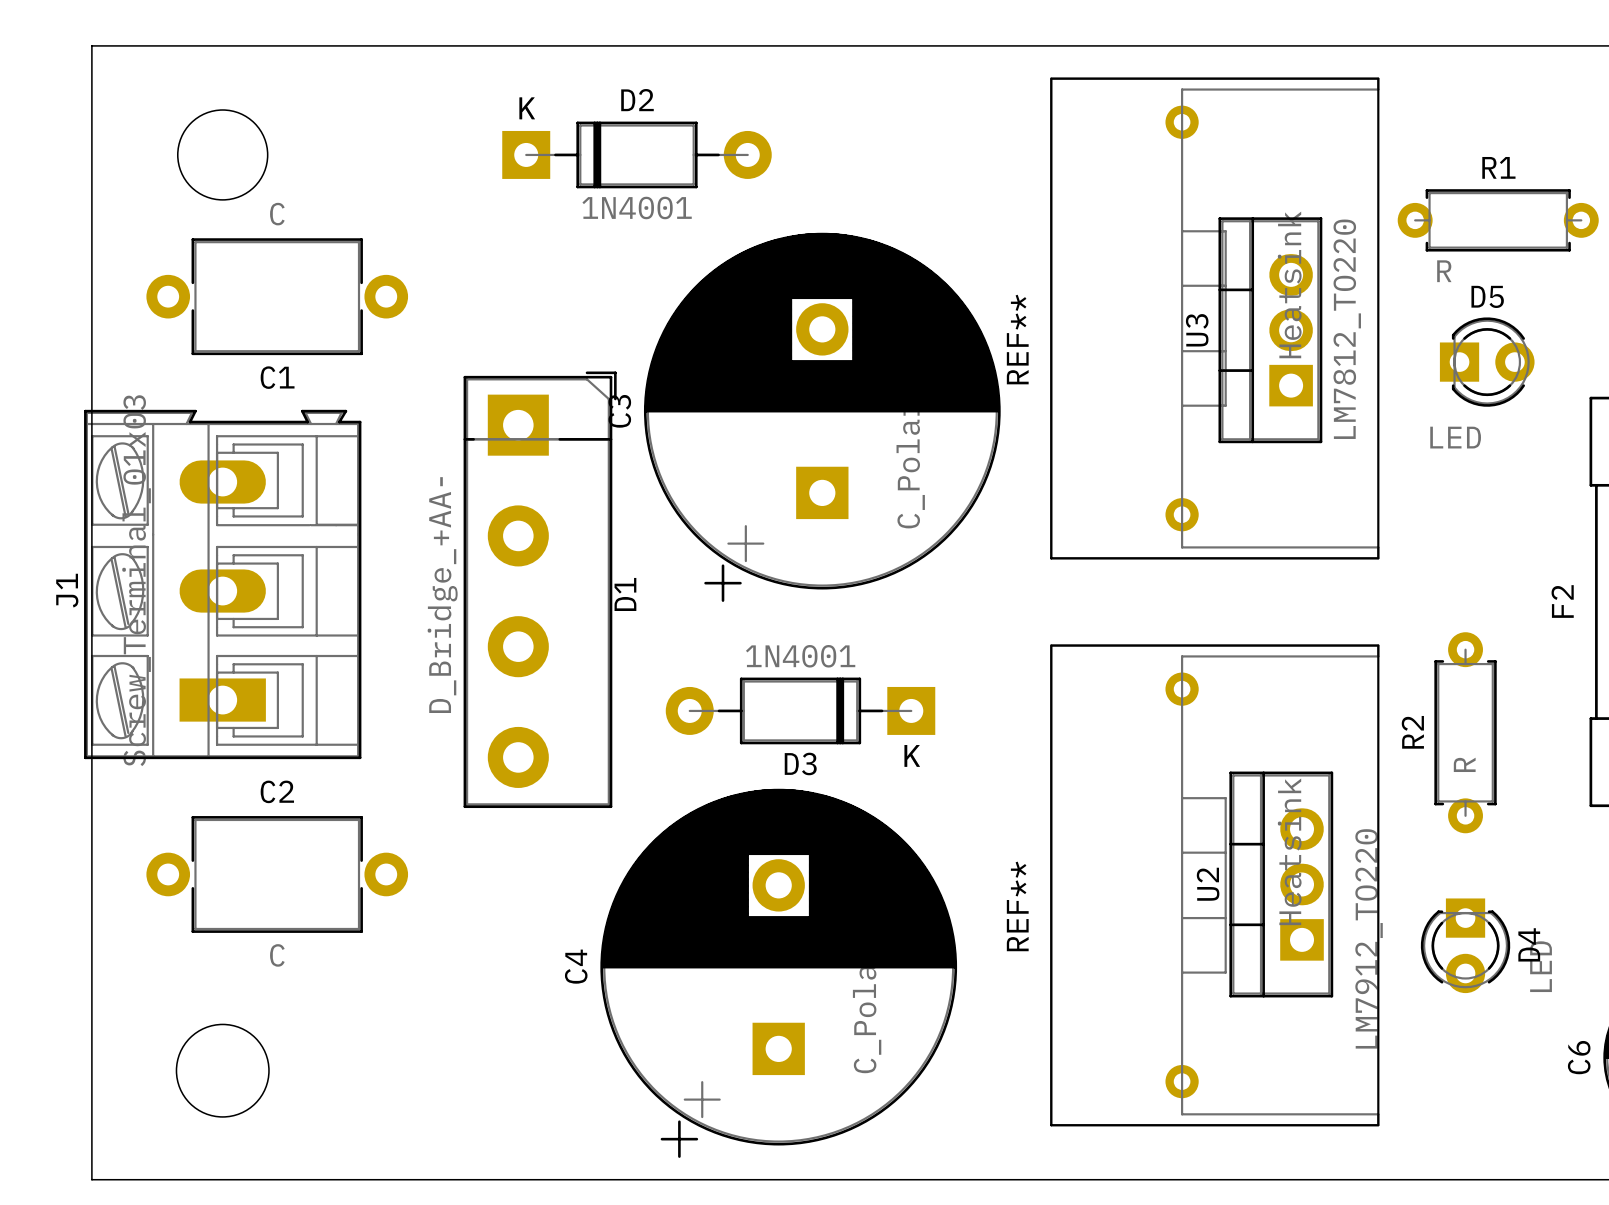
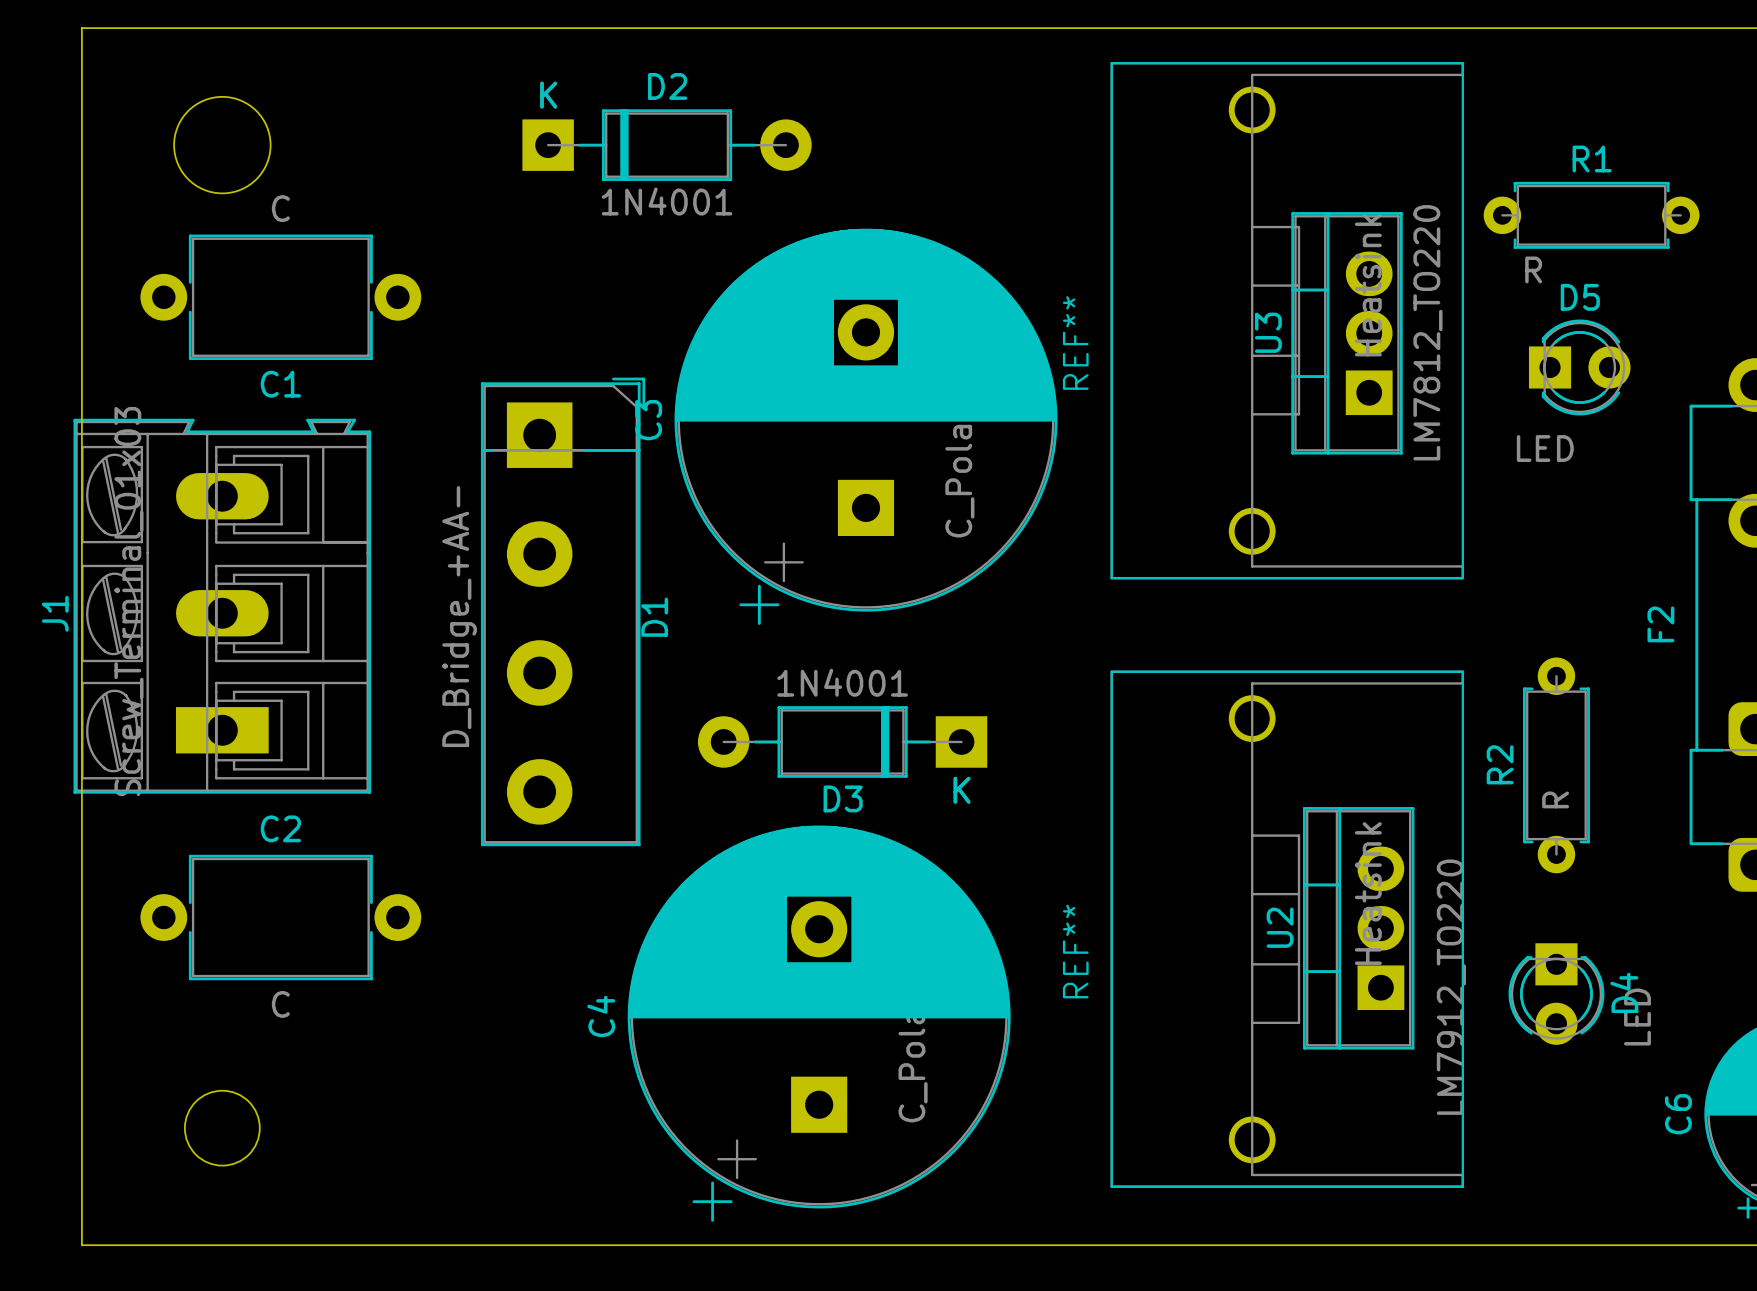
REF** footprint: [1050, 77, 1380, 560] -> [1110, 62, 1465, 580]
REF** footprint: [1050, 644, 1380, 1127] -> [1110, 670, 1465, 1188]
round board edge size: [175, 1023, 270, 1118] -> [184, 1090, 261, 1167]

